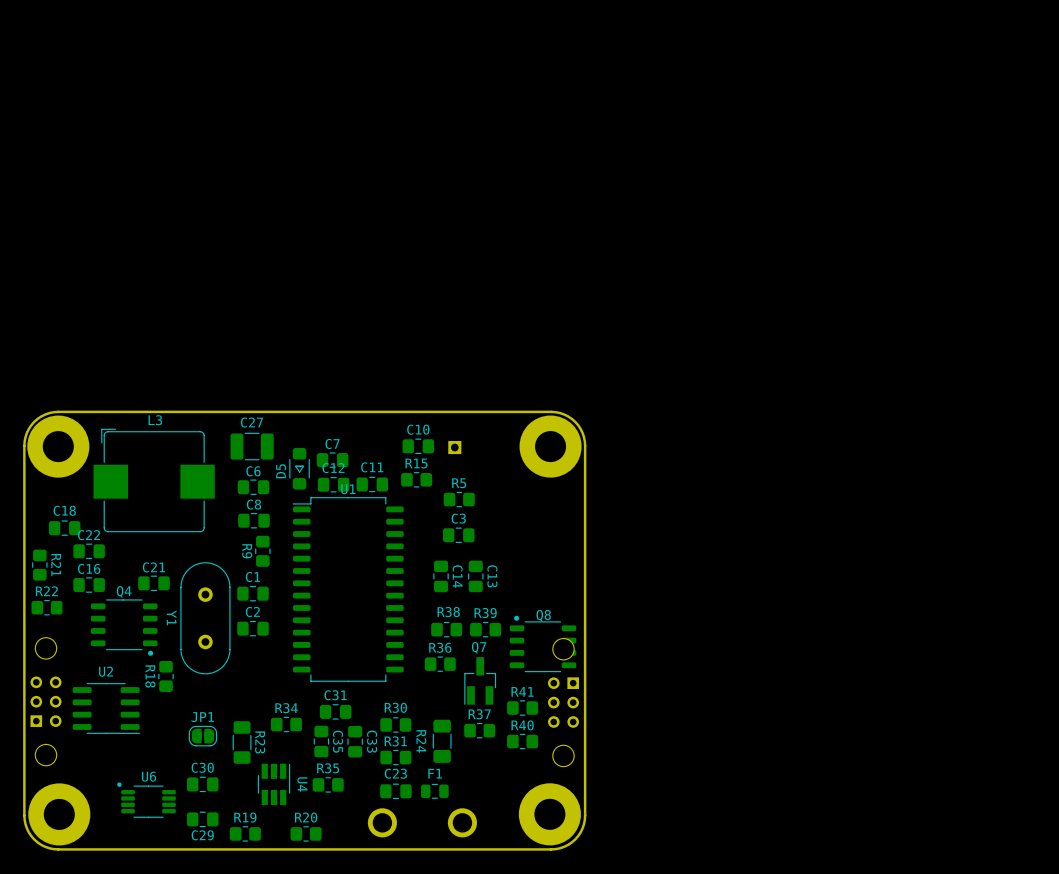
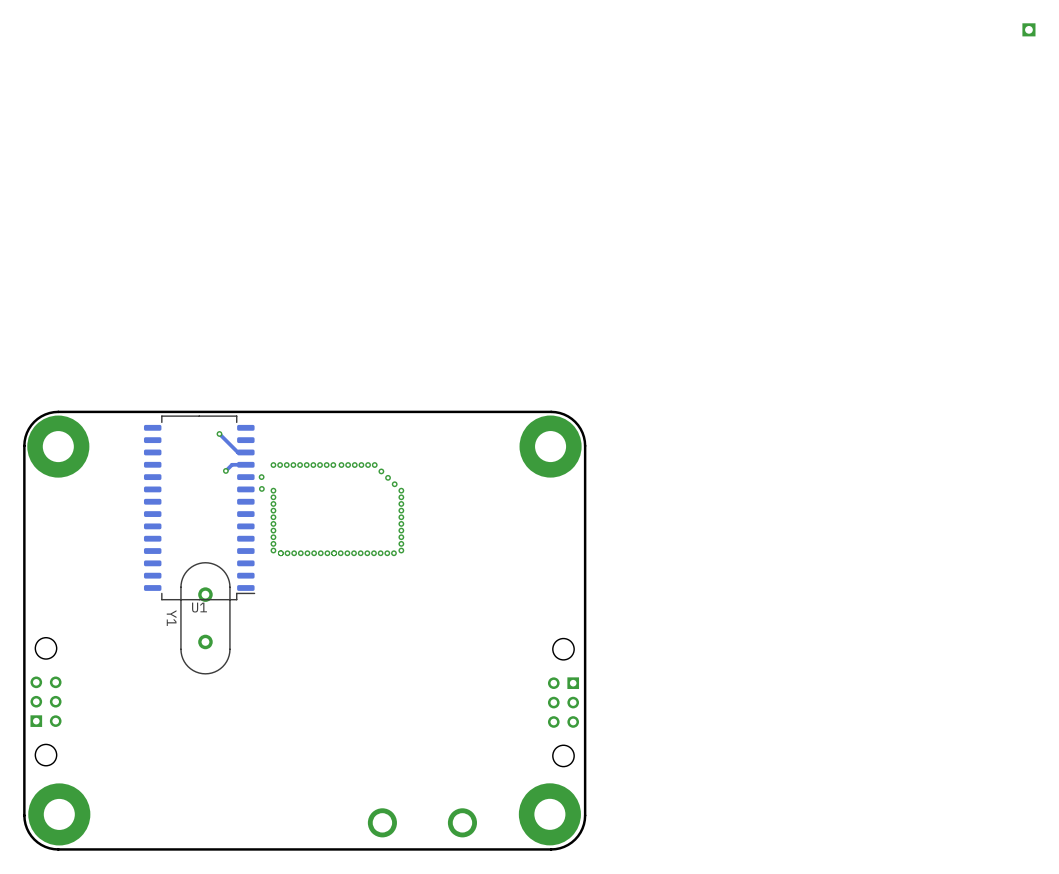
part: none -> (1028, 29)
track: none -> (219, 433) (237, 452) (245, 452)
via: none -> (219, 433)
C27: (252, 446) -> none
C10: (418, 446) -> none
part: (454, 447) -> none
C7: (332, 460) -> none
track: none -> (245, 464) (232, 464) (225, 470)
via: none -> (273, 465)
via: none -> (280, 465)
via: none -> (286, 465)
via: none -> (293, 465)
via: none -> (300, 465)
via: none -> (306, 465)
via: none -> (313, 465)
via: none -> (320, 465)
via: none -> (326, 465)
via: none -> (333, 465)
via: none -> (341, 465)
via: none -> (348, 465)
via: none -> (354, 465)
via: none -> (361, 465)
via: none -> (368, 465)
via: none -> (374, 465)
D5: (299, 468) -> none
via: none -> (225, 470)
via: none -> (381, 471)
via: none -> (261, 477)
via: none -> (388, 477)
R15: (416, 479) -> none
L3: (154, 480) -> none
C12: (333, 484) -> none
C11: (372, 484) -> none
via: none -> (394, 484)
C6: (253, 487) -> none
via: none -> (261, 488)
via: none -> (273, 490)
via: none -> (401, 490)
via: none -> (273, 497)
via: none -> (401, 497)
R5: (459, 499) -> none
via: none -> (273, 503)
via: none -> (401, 503)
via: none -> (273, 510)
via: none -> (401, 510)
via: none -> (273, 517)
via: none -> (401, 517)
C8: (253, 520) -> none
via: none -> (273, 523)
via: none -> (401, 523)
C18: (64, 528) -> none
via: none -> (273, 530)
via: none -> (401, 530)
C3: (458, 535) -> none
via: none -> (273, 537)
via: none -> (401, 537)
via: none -> (273, 543)
via: none -> (401, 543)
via: none -> (273, 550)
via: none -> (401, 550)
C22: (89, 551) -> none
R9: (262, 551) -> none
via: none -> (280, 553)
via: none -> (287, 553)
via: none -> (294, 553)
via: none -> (300, 553)
via: none -> (307, 553)
via: none -> (314, 553)
via: none -> (320, 553)
via: none -> (327, 553)
via: none -> (334, 553)
via: none -> (340, 553)
via: none -> (347, 553)
via: none -> (354, 553)
via: none -> (360, 553)
via: none -> (367, 553)
via: none -> (373, 553)
via: none -> (380, 553)
via: none -> (387, 553)
via: none -> (393, 553)
R21: (39, 565) -> none
C14: (441, 576) -> none
C13: (475, 576) -> none
C21: (153, 583) -> none
C16: (89, 585) -> none
U1 rotation: 0° (348, 589) -> 180° (199, 507)
U1 position: (348, 589) -> (199, 507)
C1: (252, 593) -> none
R22: (46, 607) -> none
Q4: (124, 627) -> none
C2: (252, 628) -> none
R38: (446, 629) -> none
R39: (485, 629) -> none
Q8: (542, 643) -> none
R36: (440, 664) -> none
R18: (166, 676) -> none
Q7: (480, 680) -> none
U2: (106, 708) -> none
R41: (522, 708) -> none
C31: (335, 711) -> none
R34: (286, 724) -> none
R30: (395, 724) -> none
R37: (479, 730) -> none
JP1: (202, 736) -> none
C35: (321, 741) -> none
C33: (355, 741) -> none
R24: (442, 741) -> none
R40: (522, 741) -> none
R23: (242, 742) -> none
R31: (395, 757) -> none
C30: (202, 784) -> none
U4: (273, 784) -> none
R35: (328, 784) -> none
C23: (395, 791) -> none
F1: (434, 791) -> none
U6: (146, 800) -> none
C29: (202, 819) -> none
R19: (245, 833) -> none
R20: (306, 833) -> none

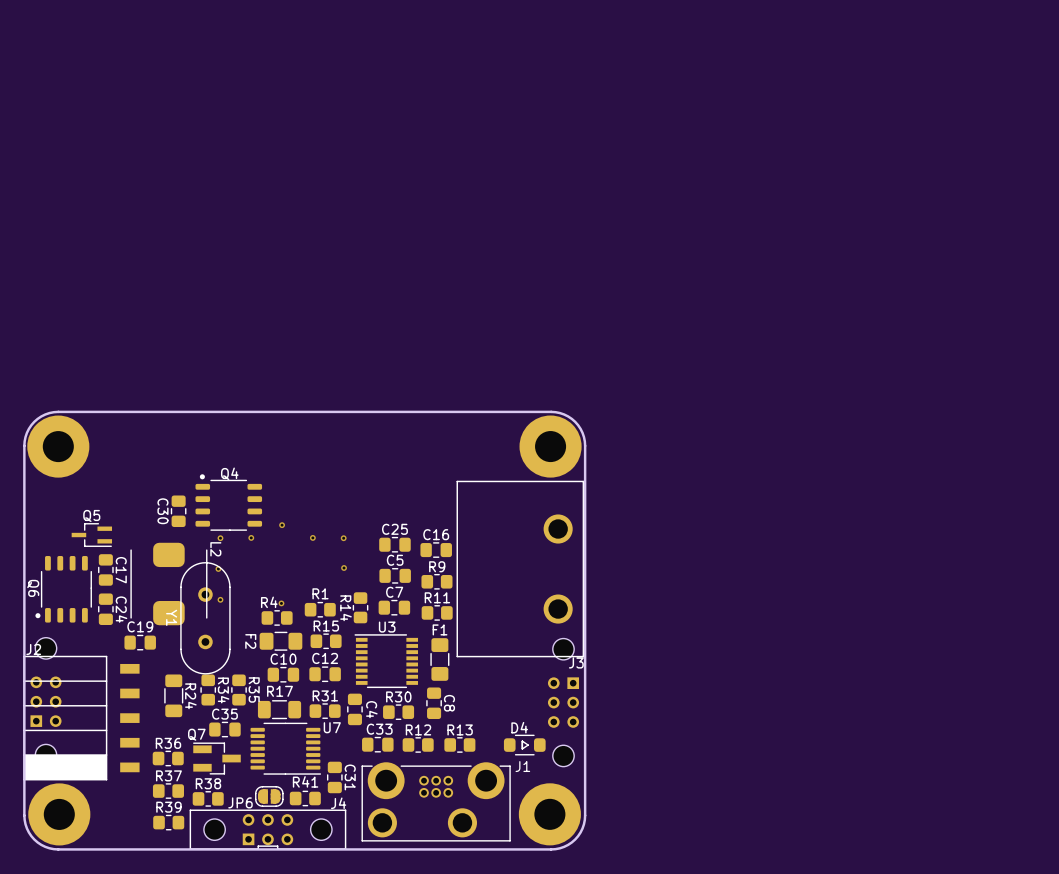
part: (1028, 29) -> none
track: (219, 433) (237, 452) (245, 452) -> none
via: (219, 433) -> none
track: (245, 464) (232, 464) (225, 470) -> none
via: (273, 465) -> none
via: (280, 465) -> none
via: (286, 465) -> none
via: (293, 465) -> none
via: (300, 465) -> none
via: (306, 465) -> none
via: (313, 465) -> none
via: (320, 465) -> none
via: (326, 465) -> none
via: (333, 465) -> none
via: (341, 465) -> none
via: (348, 465) -> none
via: (354, 465) -> none
via: (361, 465) -> none
via: (368, 465) -> none
via: (374, 465) -> none
via: (225, 470) -> none
via: (381, 471) -> none
via: (261, 477) -> none
via: (388, 477) -> none
via: (394, 484) -> none
via: (261, 488) -> none
via: (273, 490) -> none
via: (401, 490) -> none
via: (273, 497) -> none
via: (401, 497) -> none
Q4: none -> (228, 502)
via: (273, 503) -> none
via: (401, 503) -> none
U1: (199, 507) -> none
via: (273, 510) -> none
via: (401, 510) -> none
C30: none -> (178, 511)
via: (273, 517) -> none
via: (401, 517) -> none
via: (273, 523) -> none
via: (401, 523) -> none
via: none -> (282, 525)
via: (273, 530) -> none
via: (401, 530) -> none
Q5: none -> (91, 535)
via: none -> (251, 537)
via: (273, 537) -> none
via: none -> (312, 537)
via: (401, 537) -> none
via: none -> (220, 538)
via: none -> (343, 538)
via: (273, 543) -> none
via: (401, 543) -> none
C25: none -> (394, 544)
via: (273, 550) -> none
via: (401, 550) -> none
C16: none -> (436, 550)
via: (280, 553) -> none
via: (287, 553) -> none
via: (294, 553) -> none
via: (300, 553) -> none
via: (307, 553) -> none
via: (314, 553) -> none
via: (320, 553) -> none
via: (327, 553) -> none
via: (334, 553) -> none
via: (340, 553) -> none
via: (347, 553) -> none
via: (354, 553) -> none
via: (360, 553) -> none
via: (367, 553) -> none
via: (373, 553) -> none
via: (380, 553) -> none
via: (387, 553) -> none
via: (393, 553) -> none
via: none -> (218, 568)
via: none -> (344, 568)
C17: none -> (105, 569)
J3: none -> (520, 569)
C5: none -> (395, 575)
R9: none -> (436, 581)
L2: none -> (168, 584)
Q6: none -> (63, 589)
via: none -> (220, 599)
via: none -> (281, 603)
R14: none -> (360, 607)
C7: none -> (394, 607)
C24: none -> (105, 609)
R1: none -> (320, 609)
R11: none -> (437, 612)
R4: none -> (277, 617)
F2: none -> (280, 641)
R15: none -> (326, 641)
C19: none -> (140, 642)
F1: none -> (439, 659)
U3: none -> (386, 661)
C10: none -> (283, 674)
C12: none -> (325, 674)
R34: none -> (208, 690)
R35: none -> (239, 690)
R24: none -> (173, 695)
C8: none -> (434, 703)
R17: none -> (279, 709)
C4: none -> (354, 709)
R31: none -> (325, 711)
R30: none -> (398, 712)
J2: none -> (81, 718)
C35: none -> (224, 729)
C33: none -> (377, 744)
R12: none -> (418, 744)
R13: none -> (459, 744)
D4: none -> (524, 745)
U7: none -> (285, 748)
R36: none -> (168, 758)
Q7: none -> (216, 758)
C31: none -> (334, 777)
R37: none -> (168, 791)
JP6: none -> (269, 796)
R38: none -> (208, 798)
R41: none -> (305, 798)
J1: none -> (436, 801)
R39: none -> (168, 822)
J4: none -> (267, 829)

